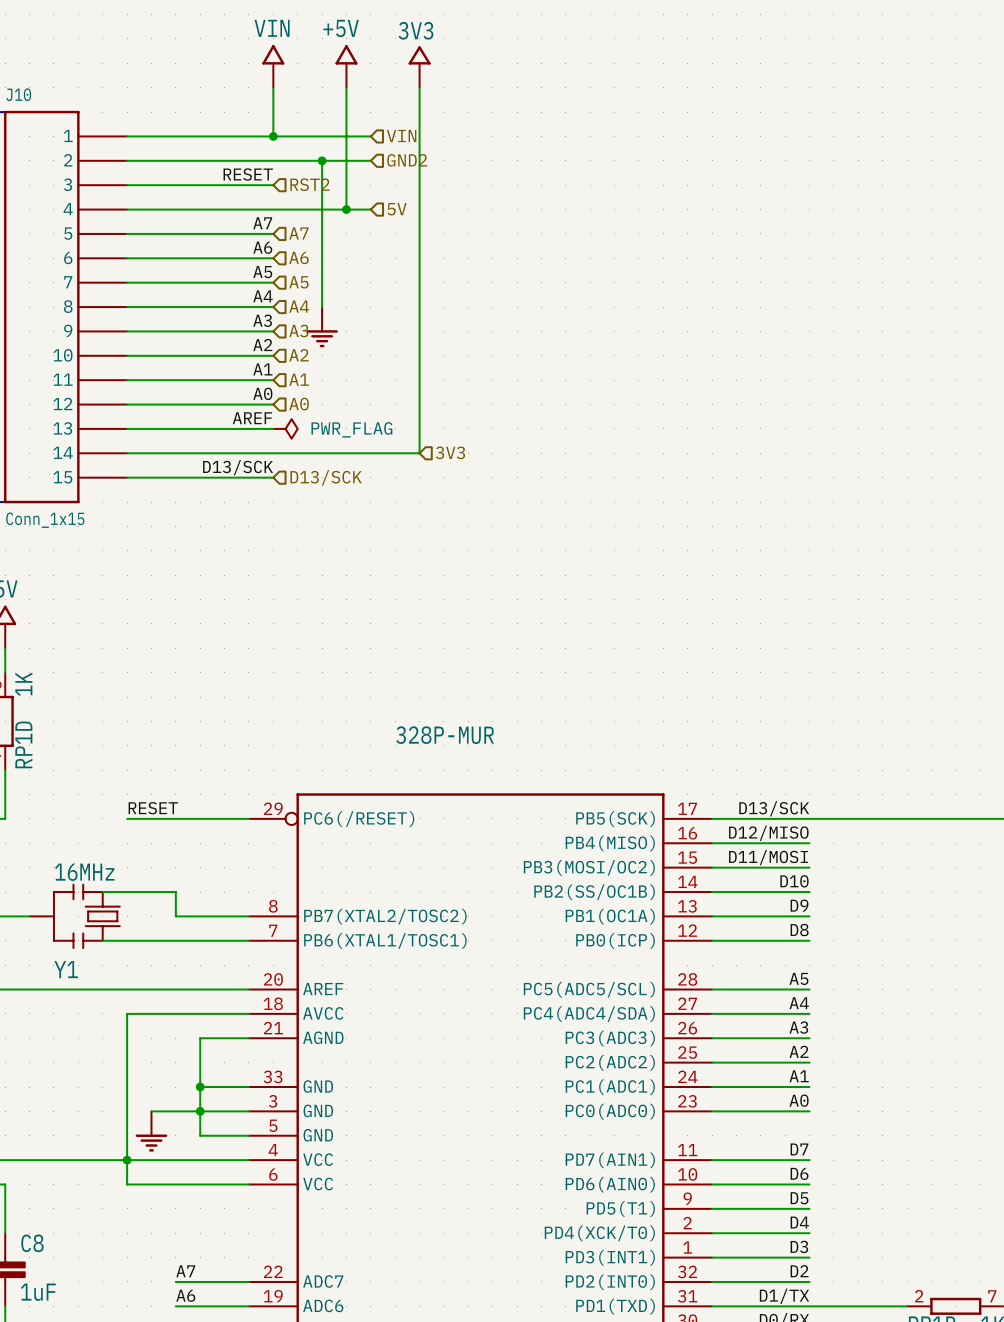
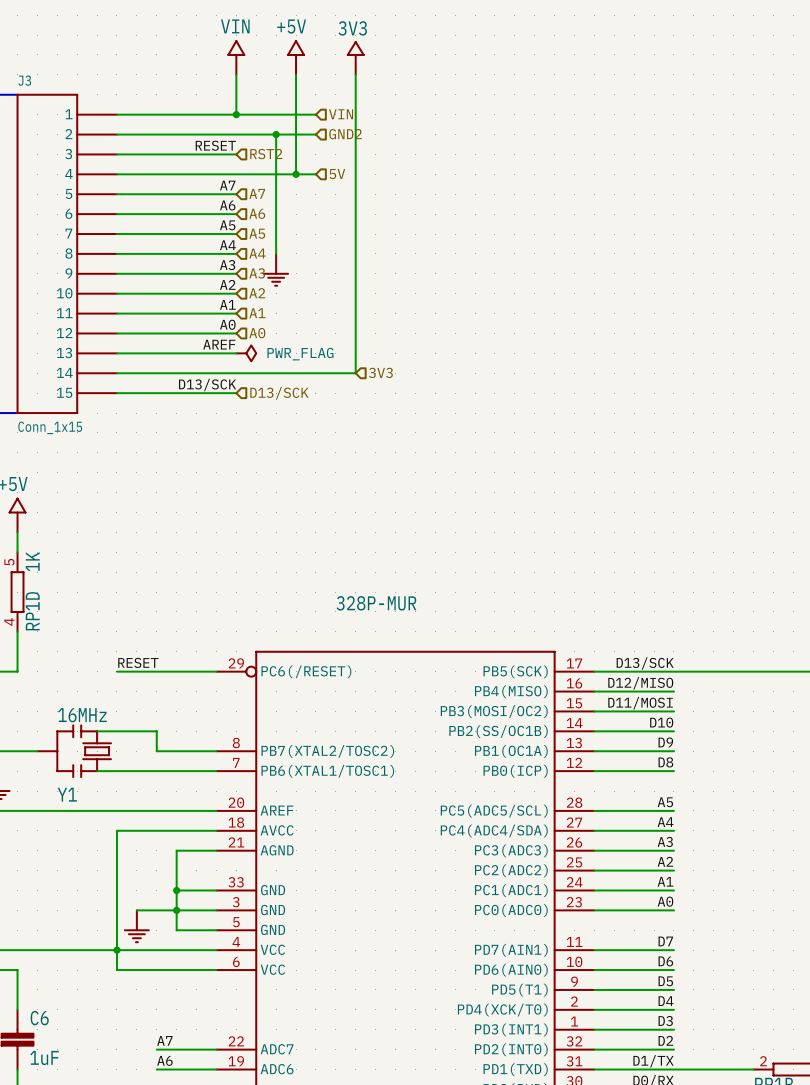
J10 name: J10 (18, 94) -> J3 (24, 80)
C8 name: C8 (32, 1243) -> C6 (39, 1018)

